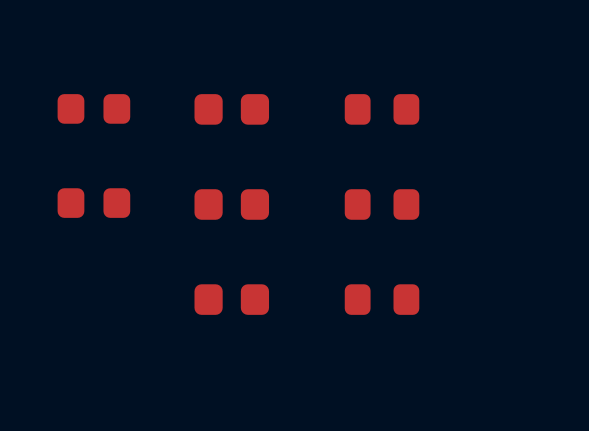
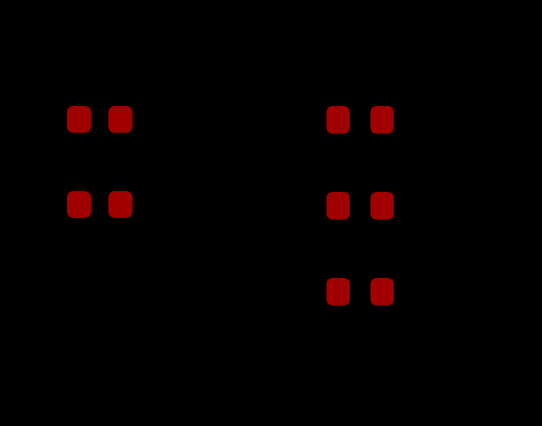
part: (231, 109) -> none
part: (231, 204) -> none
part: (231, 299) -> none

